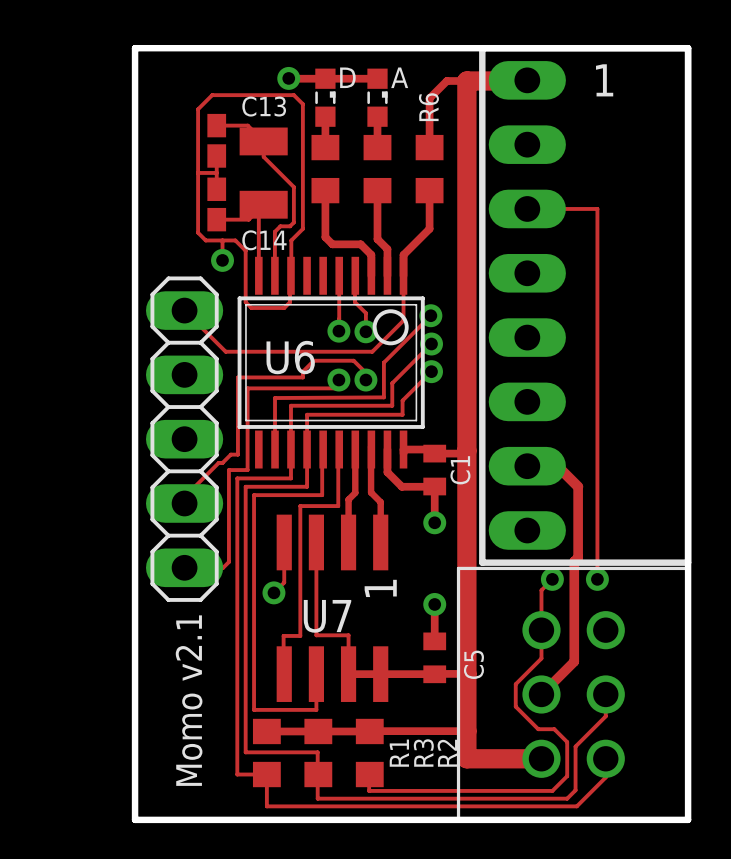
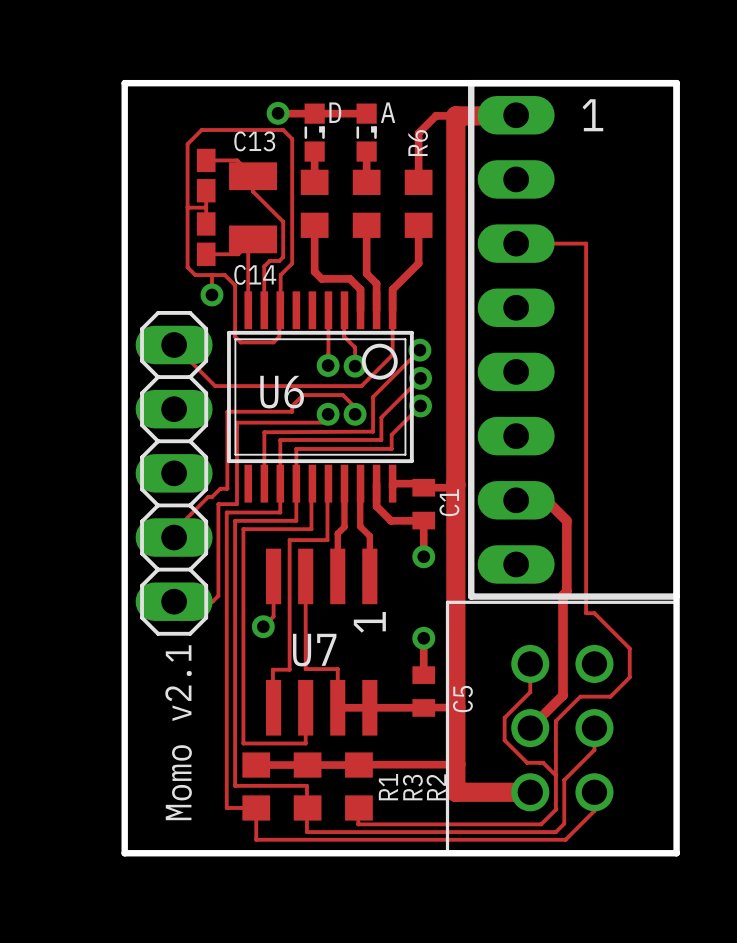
track: (552, 579) (541, 590) (541, 630) -> none
via: (552, 579) -> none
track: none -> (586, 613) (594, 613) (629, 648) (629, 677) (610, 696) (580, 696) (555, 721) (555, 775)
via: (597, 579) -> none

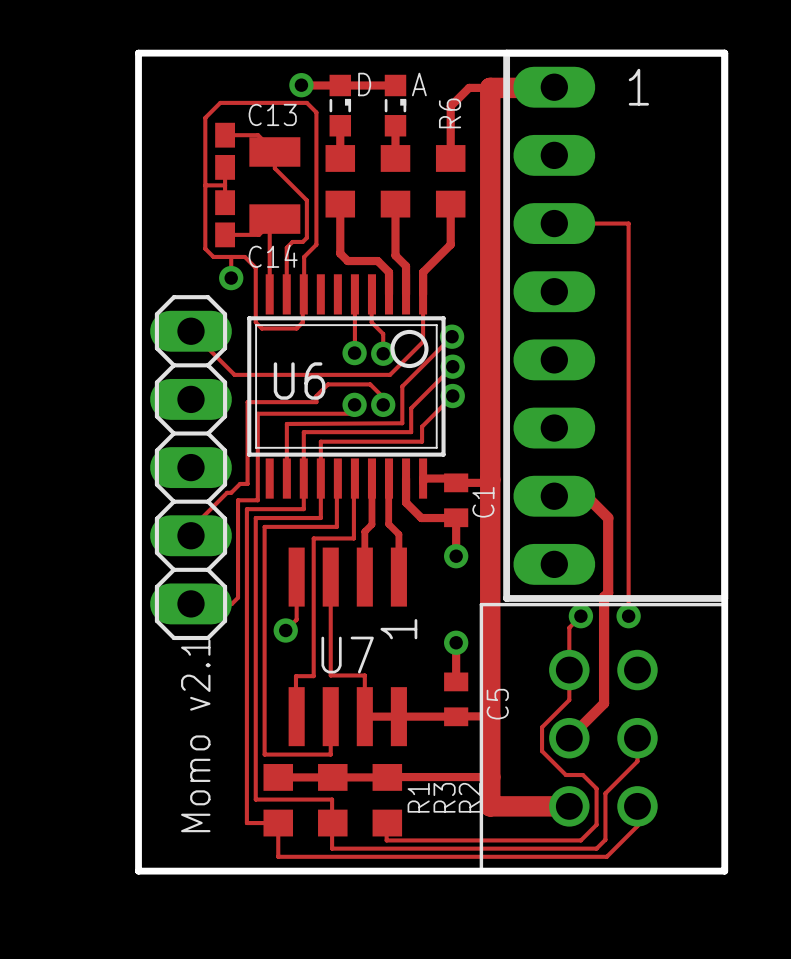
track: none -> (580, 616) (569, 627) (569, 670)
via: none -> (580, 616)
track: (586, 613) (594, 613) (629, 648) (629, 677) (610, 696) (580, 696) (555, 721) (555, 775) -> none
via: none -> (628, 616)

